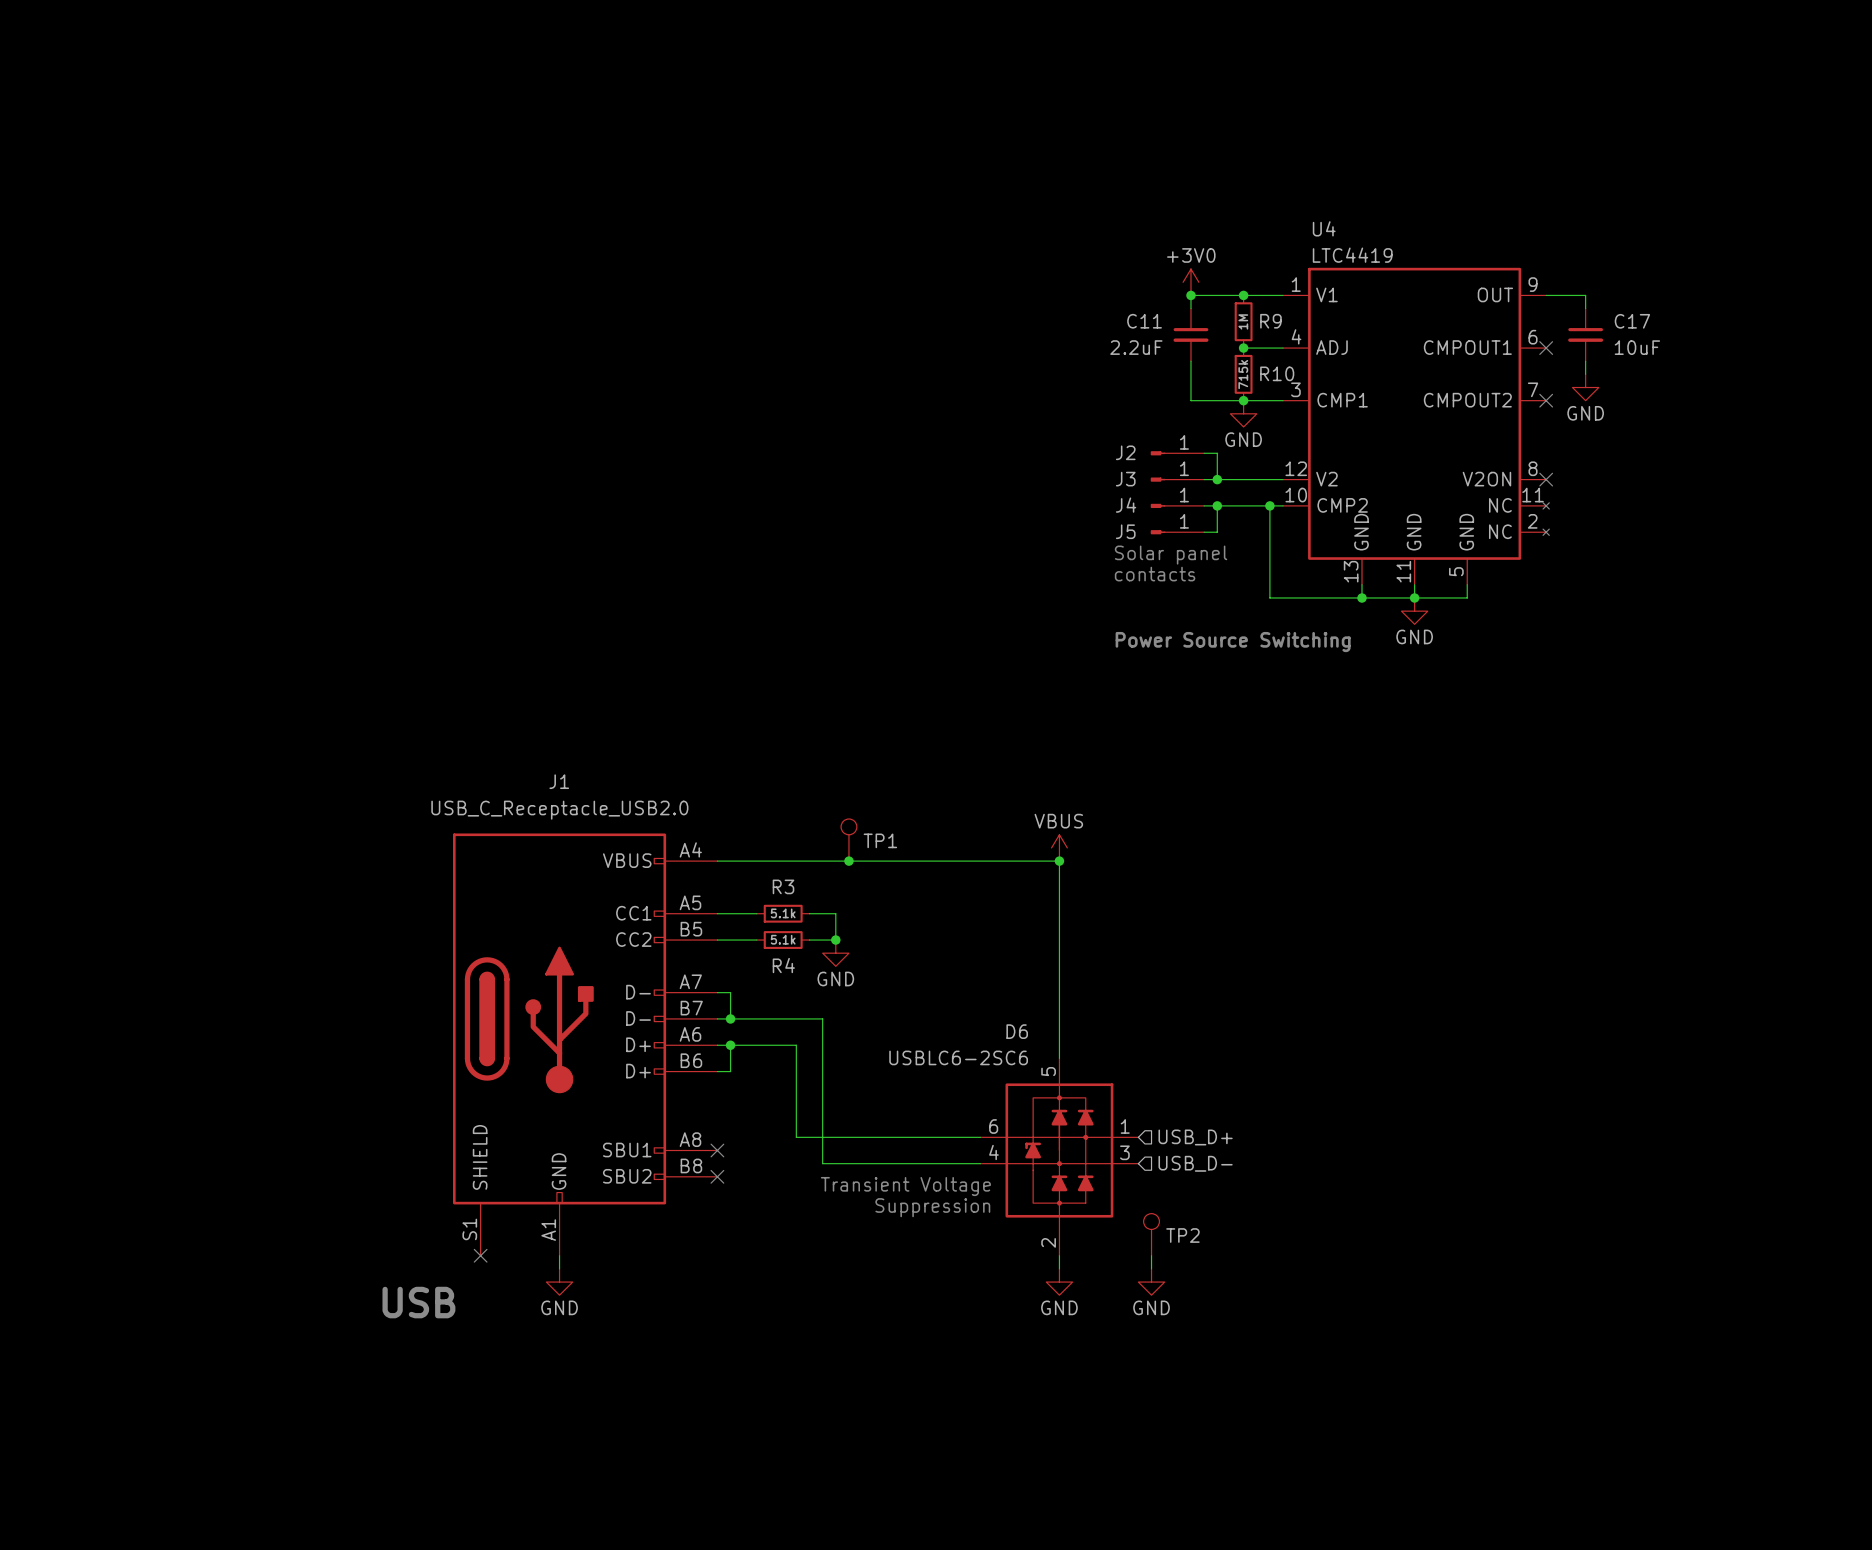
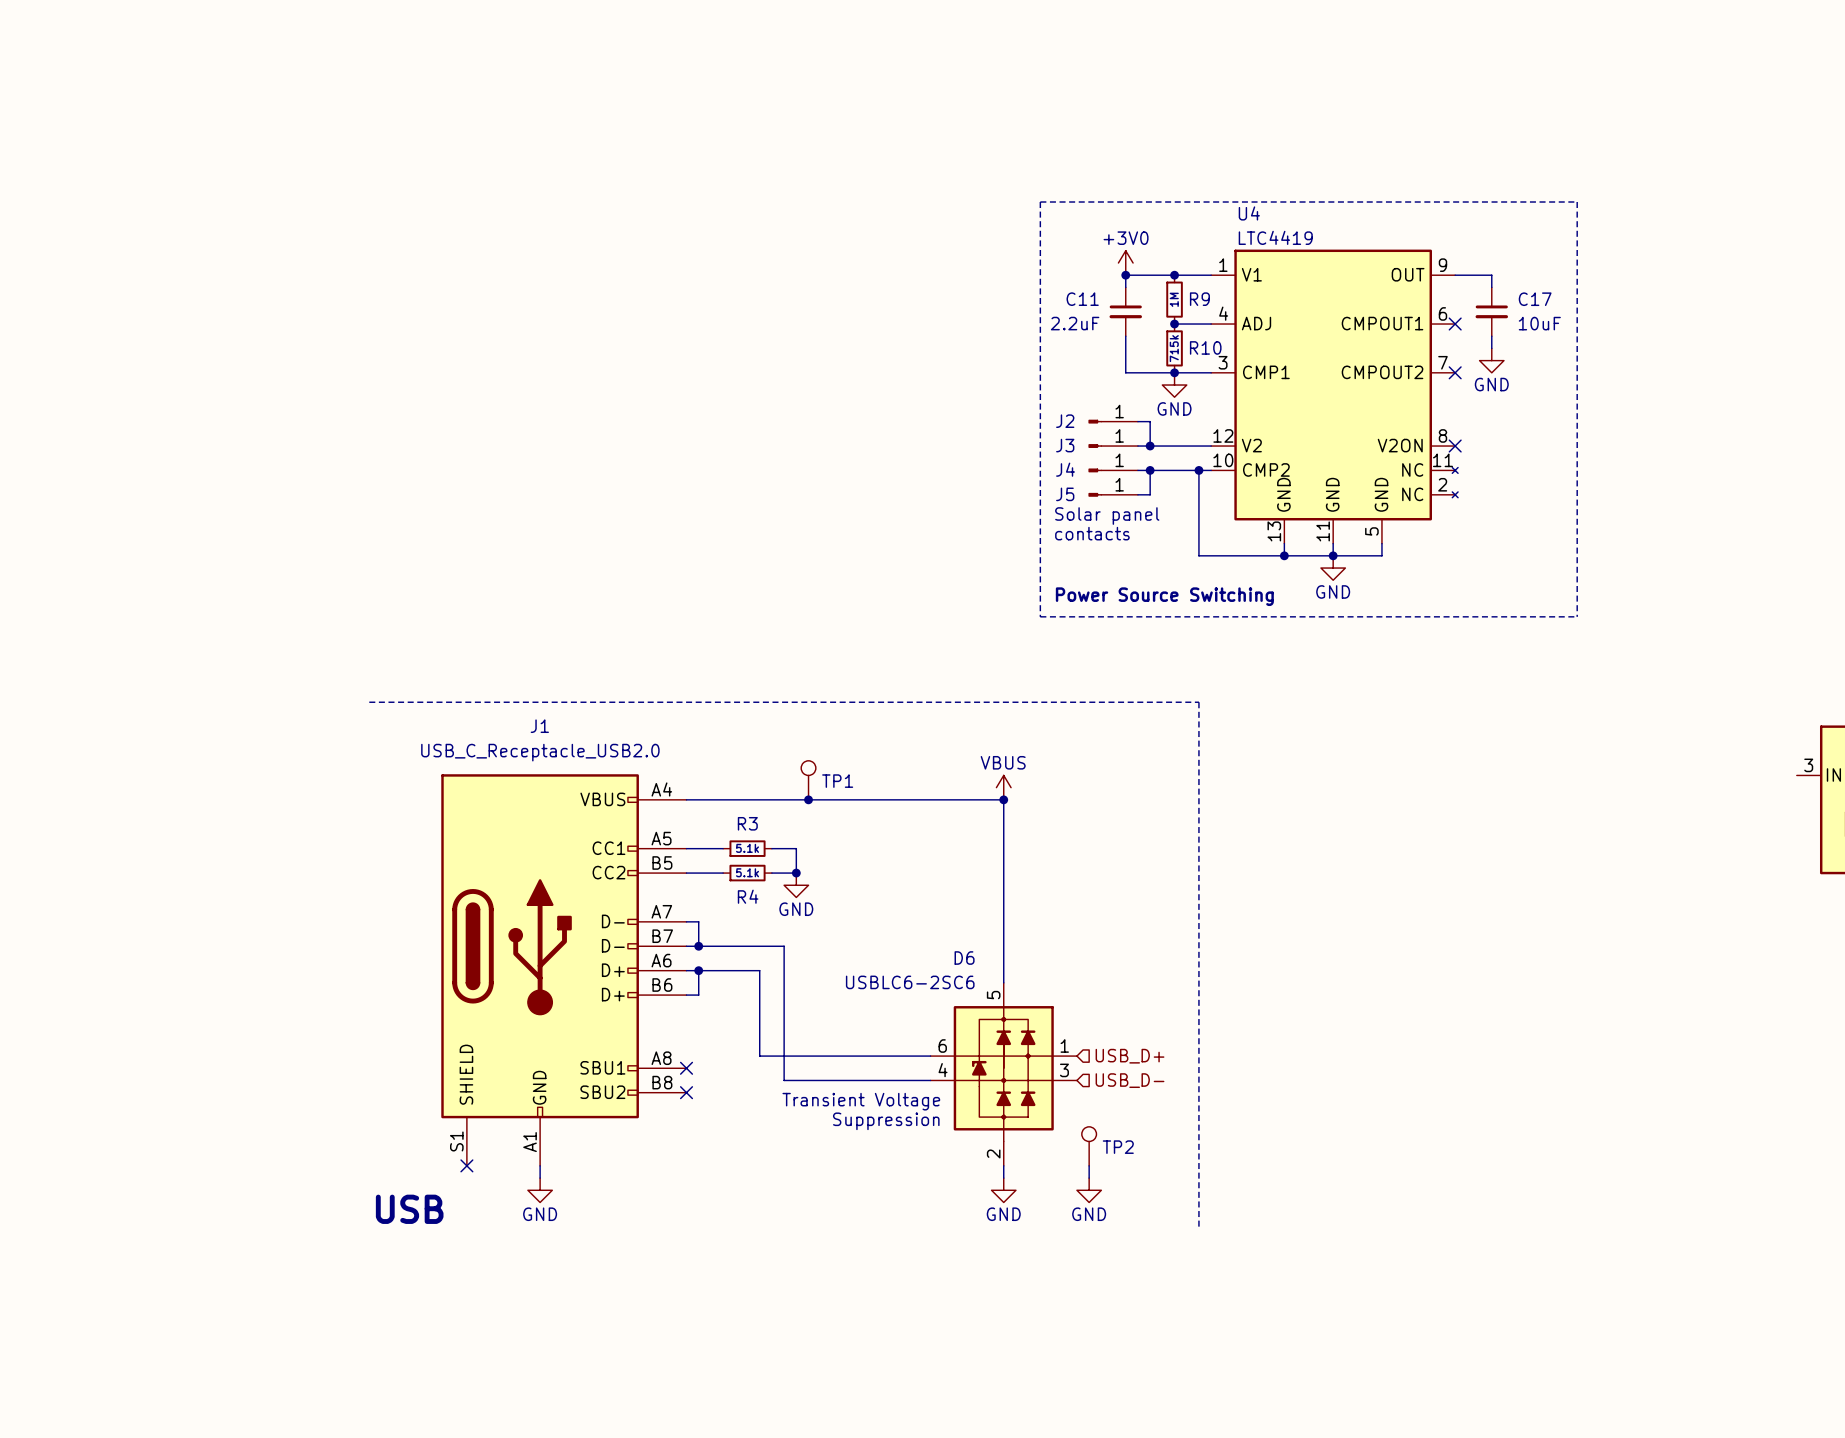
line: none -> (1040, 202) (1040, 616) (1577, 616) (1577, 202) (1040, 202)
line: none -> (369, 702) (1198, 702) (1198, 1226)

